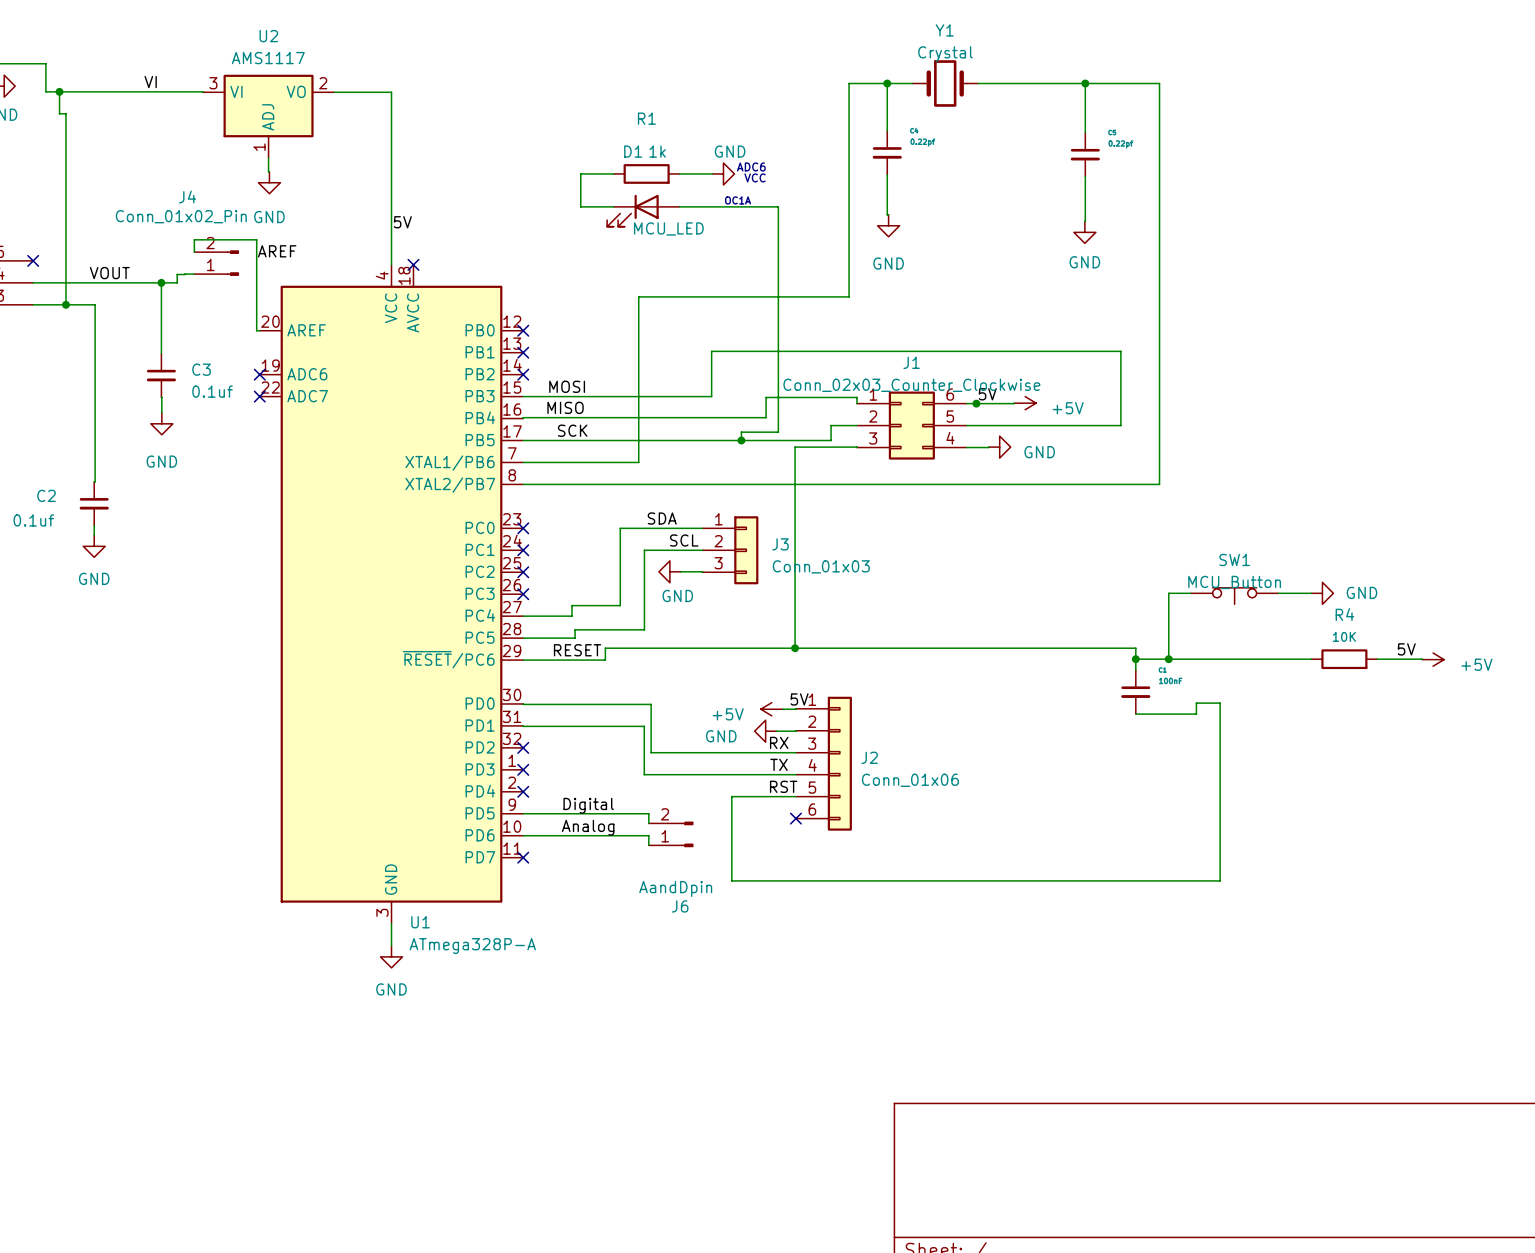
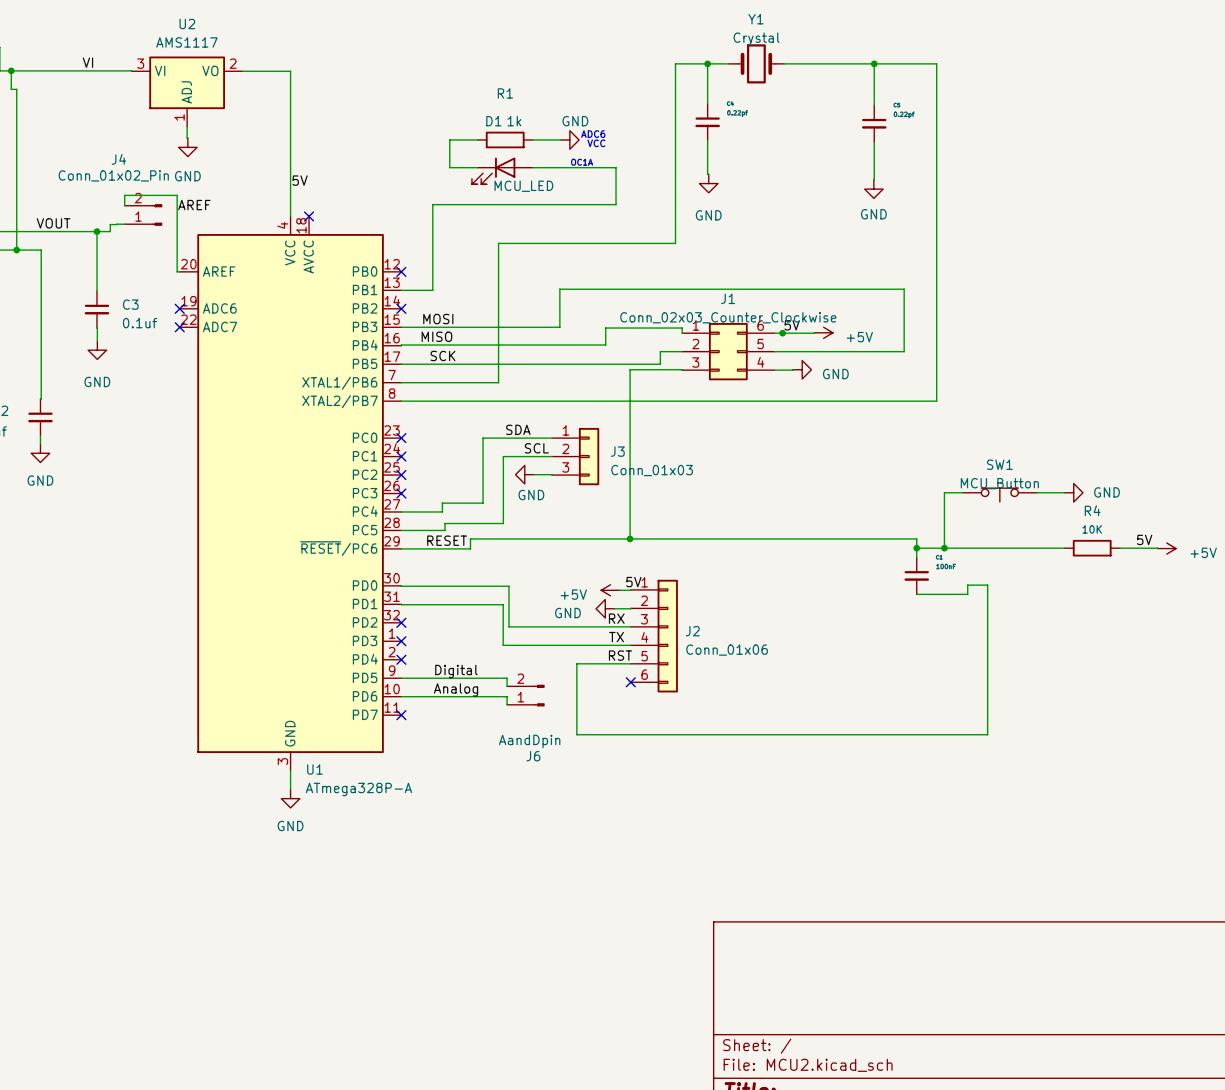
wire: (778, 250) (778, 432) (741, 432) (741, 440) -> (616, 204) (432, 204) (432, 290) (401, 290)
no-connect mark: (523, 352) -> none
junction: (741, 440) -> none

